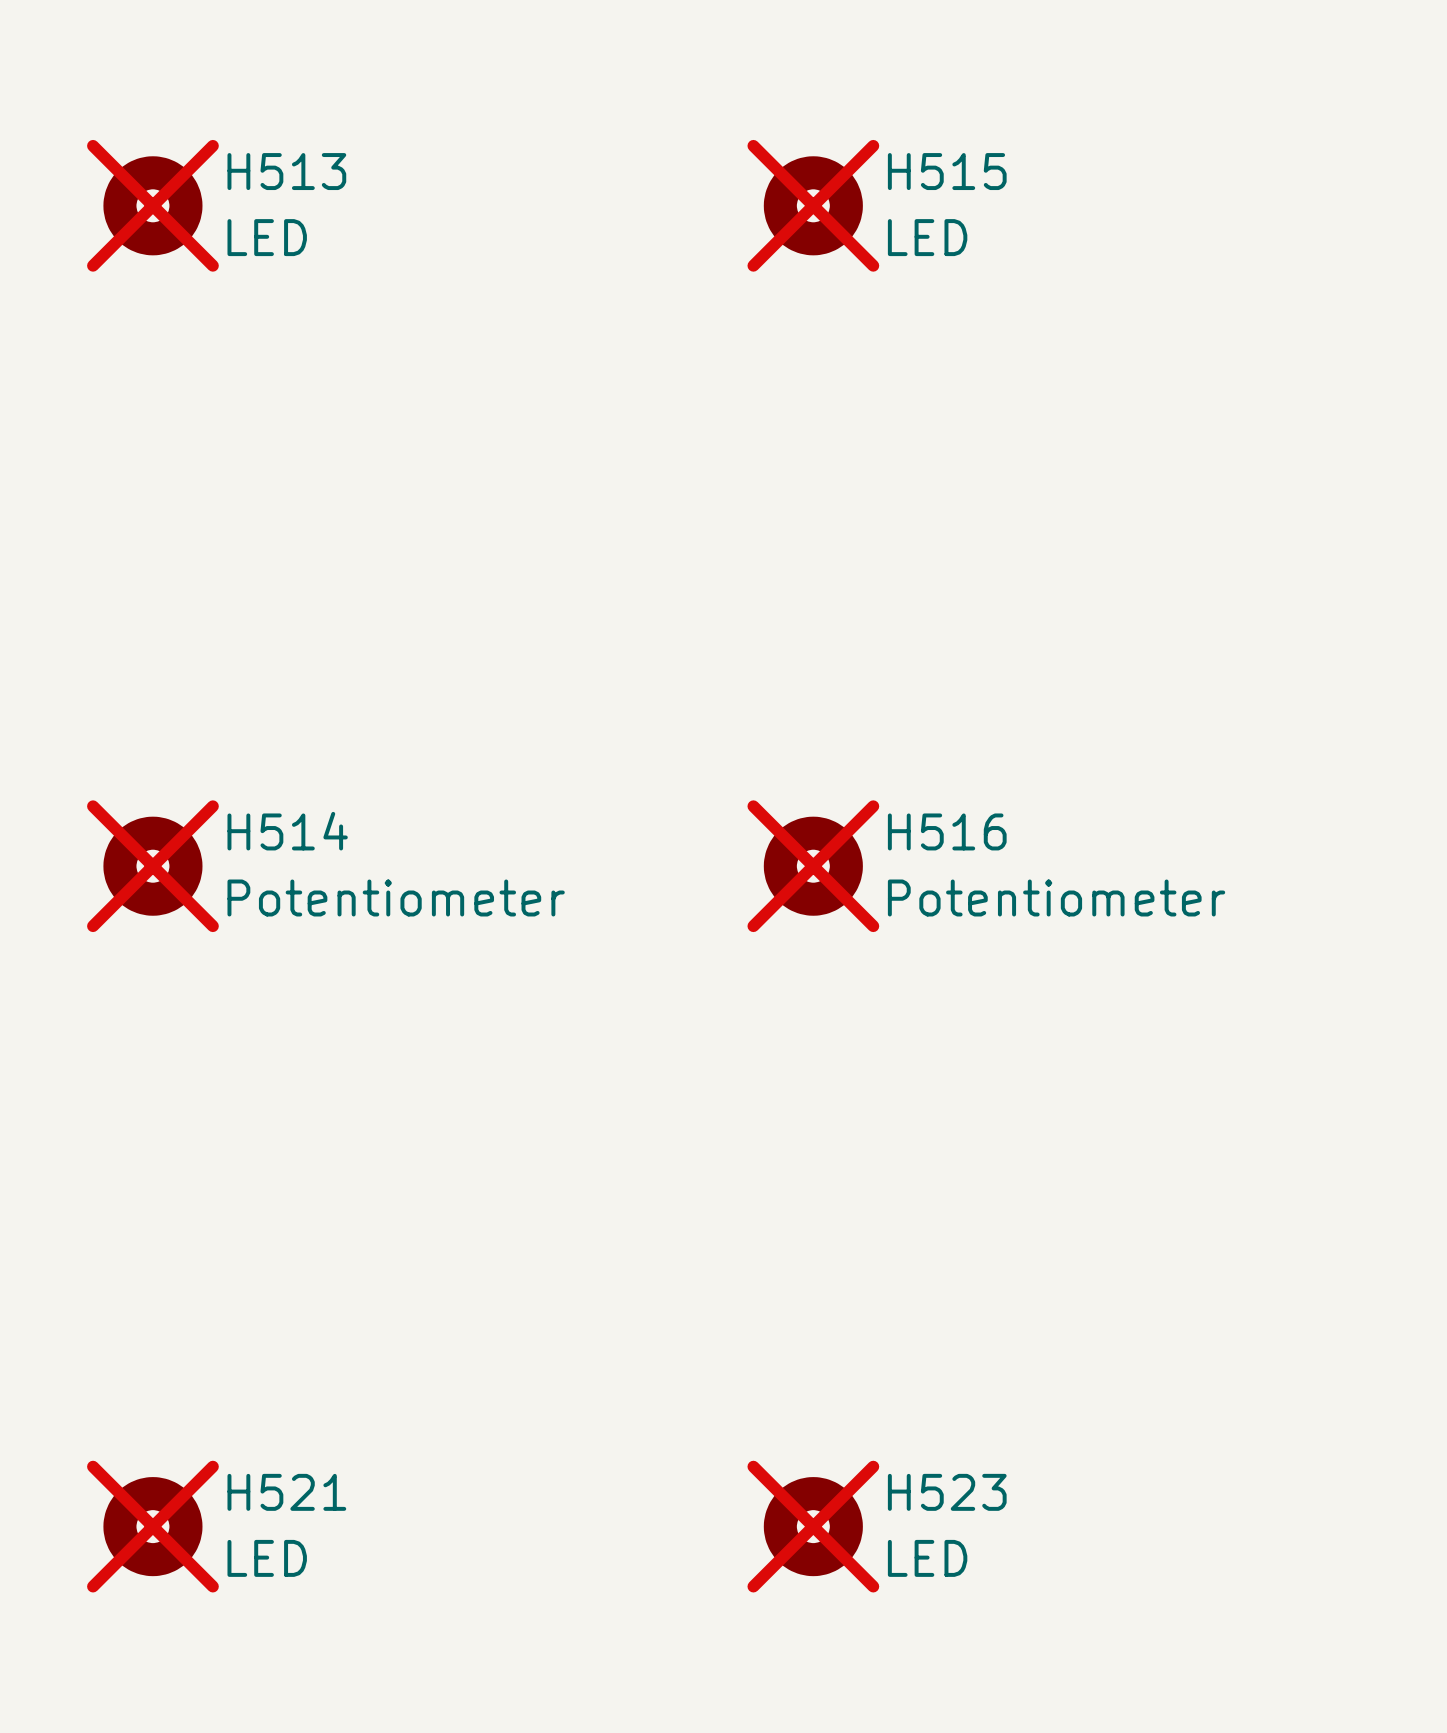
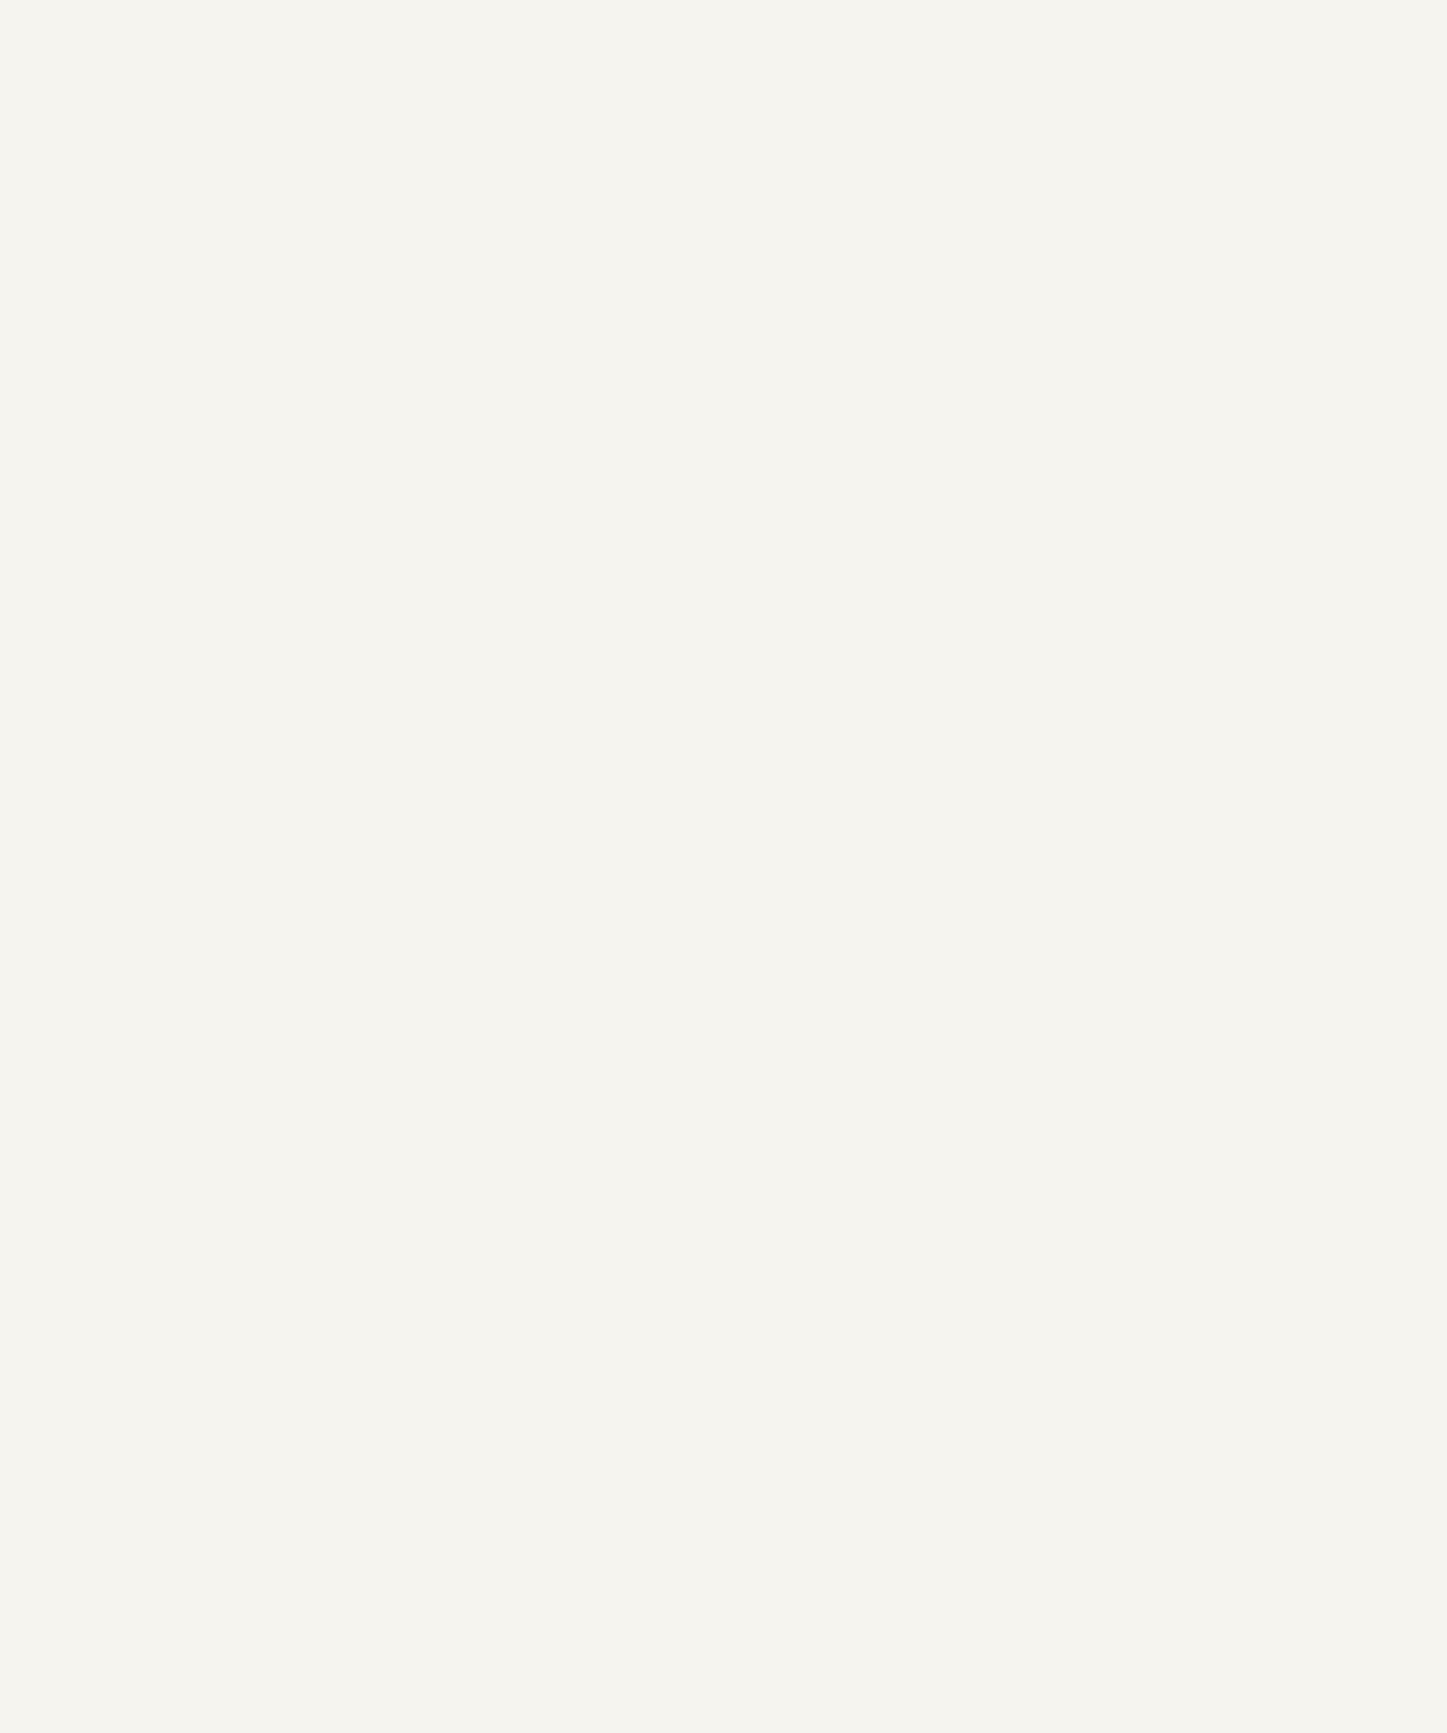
H513: LED (152, 205) -> none
H515: LED (813, 205) -> none
H514: Potentiometer (152, 866) -> none
H516: Potentiometer (813, 866) -> none
H521: LED (152, 1526) -> none
H523: LED (813, 1526) -> none

